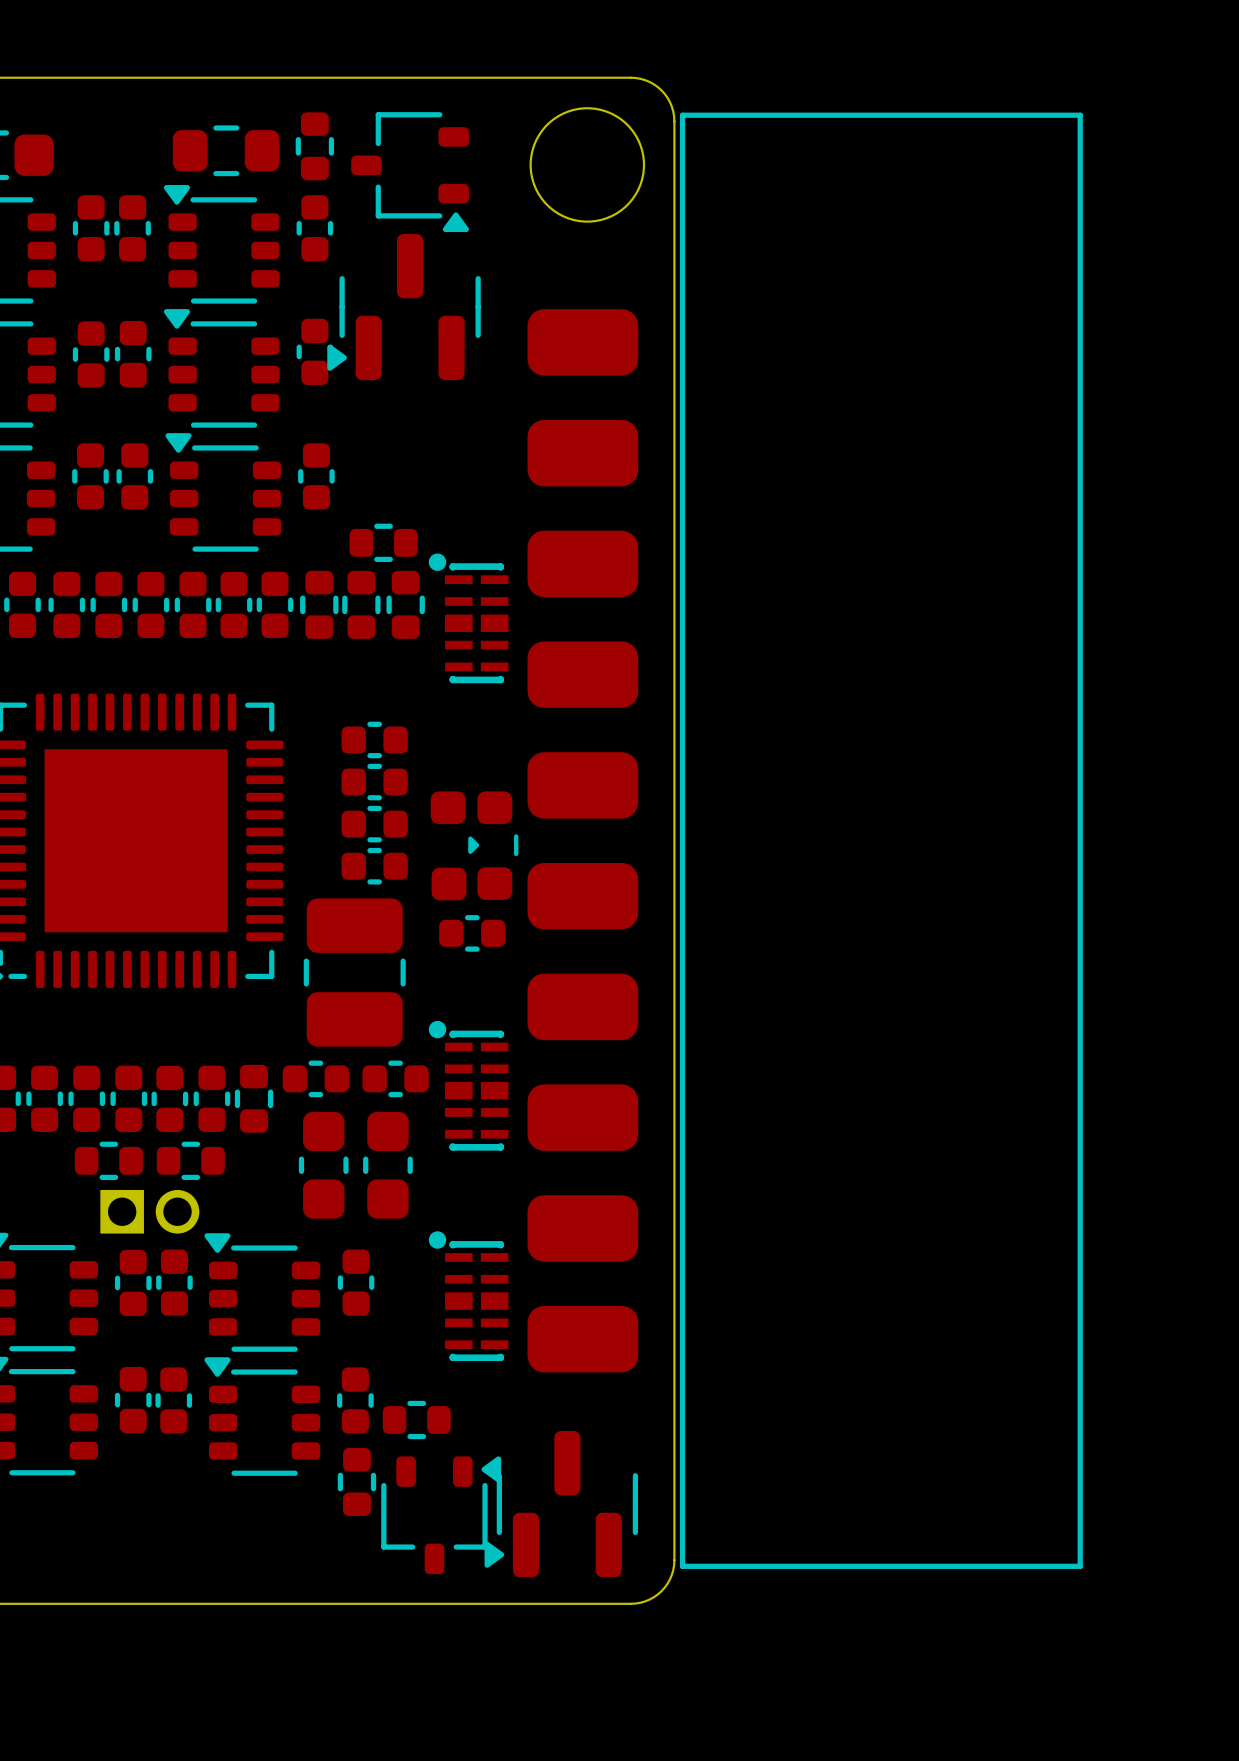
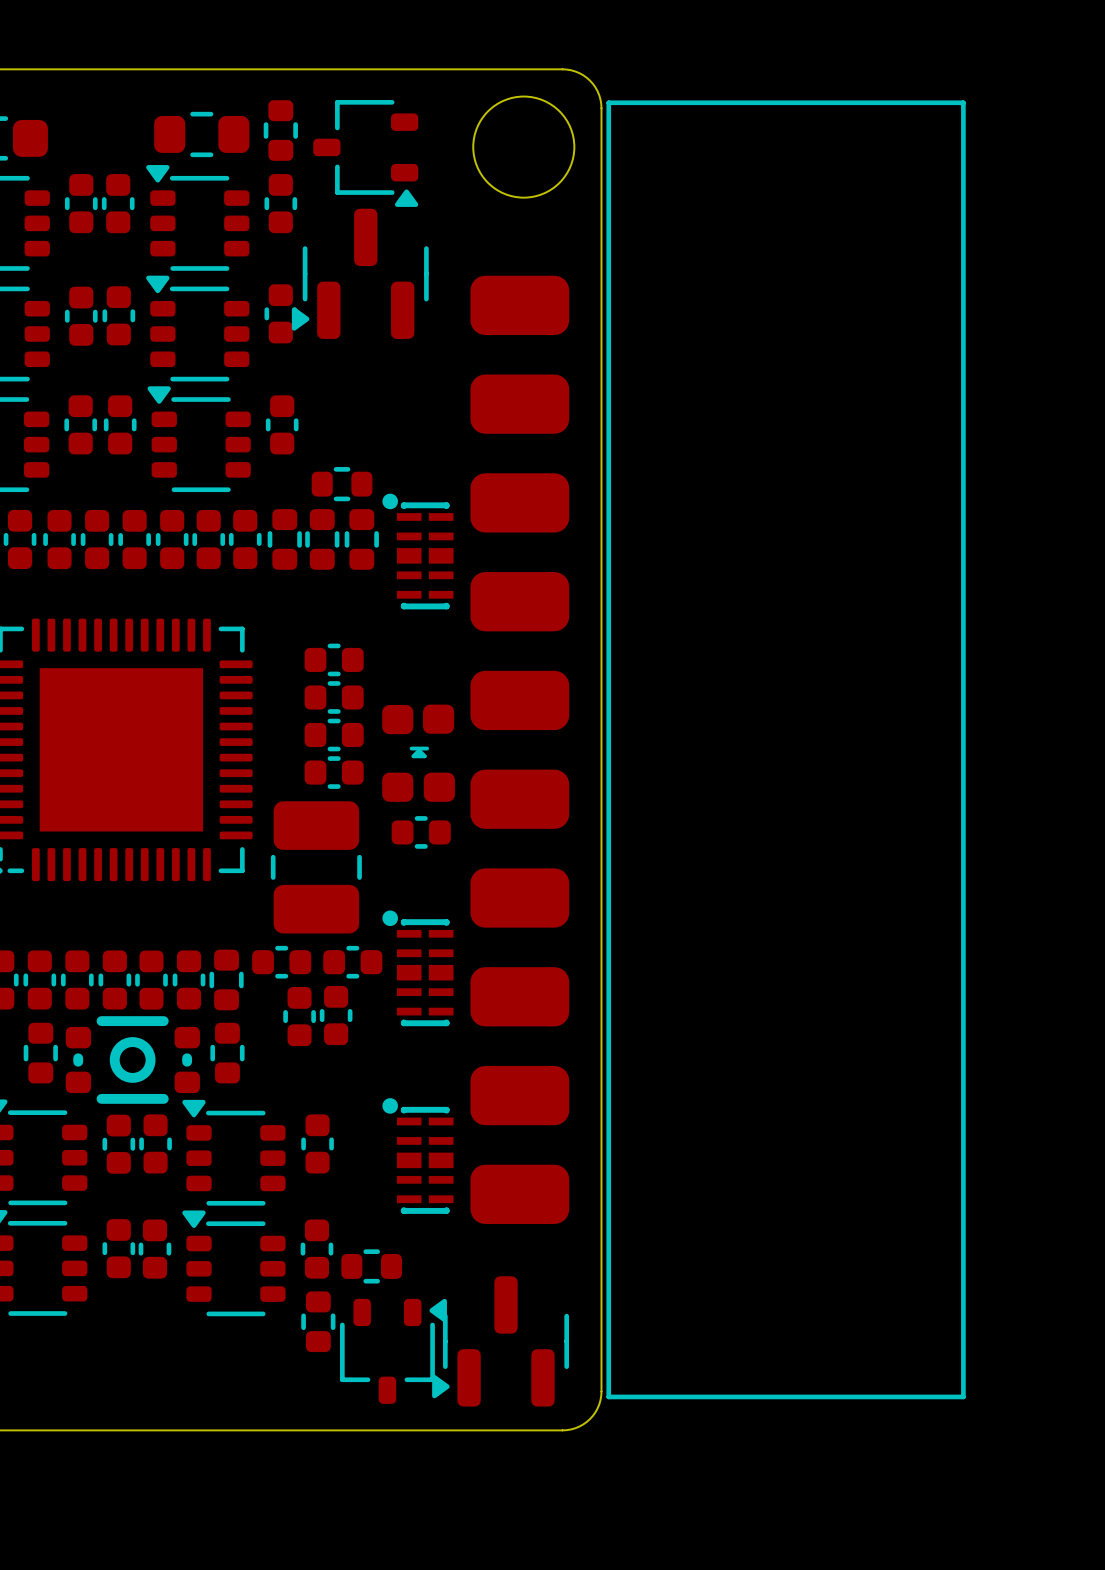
part footprint: [430, 791, 519, 901] -> [382, 704, 455, 802]
part footprint: [298, 1111, 349, 1219] -> [283, 986, 316, 1047]
part: none -> (336, 1015)
part rotation: 0° (108, 1160) -> 90° clockwise (40, 1053)
part position: (108, 1160) -> (40, 1053)
part rotation: 0° (190, 1160) -> 90° clockwise (227, 1053)
part position: (190, 1160) -> (227, 1053)
part: (387, 1165) -> none
part footprint: [100, 1189, 200, 1234] -> [65, 1016, 200, 1104]

